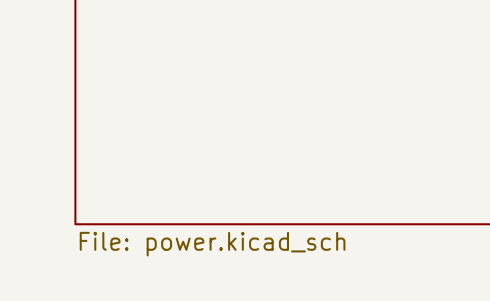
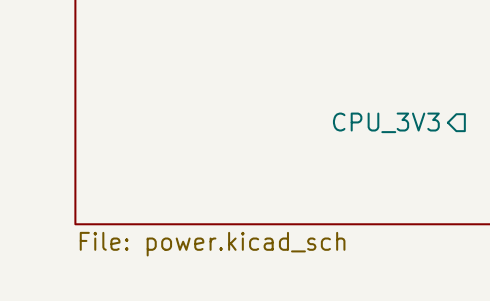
sheet pin: none -> CPU_3V3 (386, 122)

